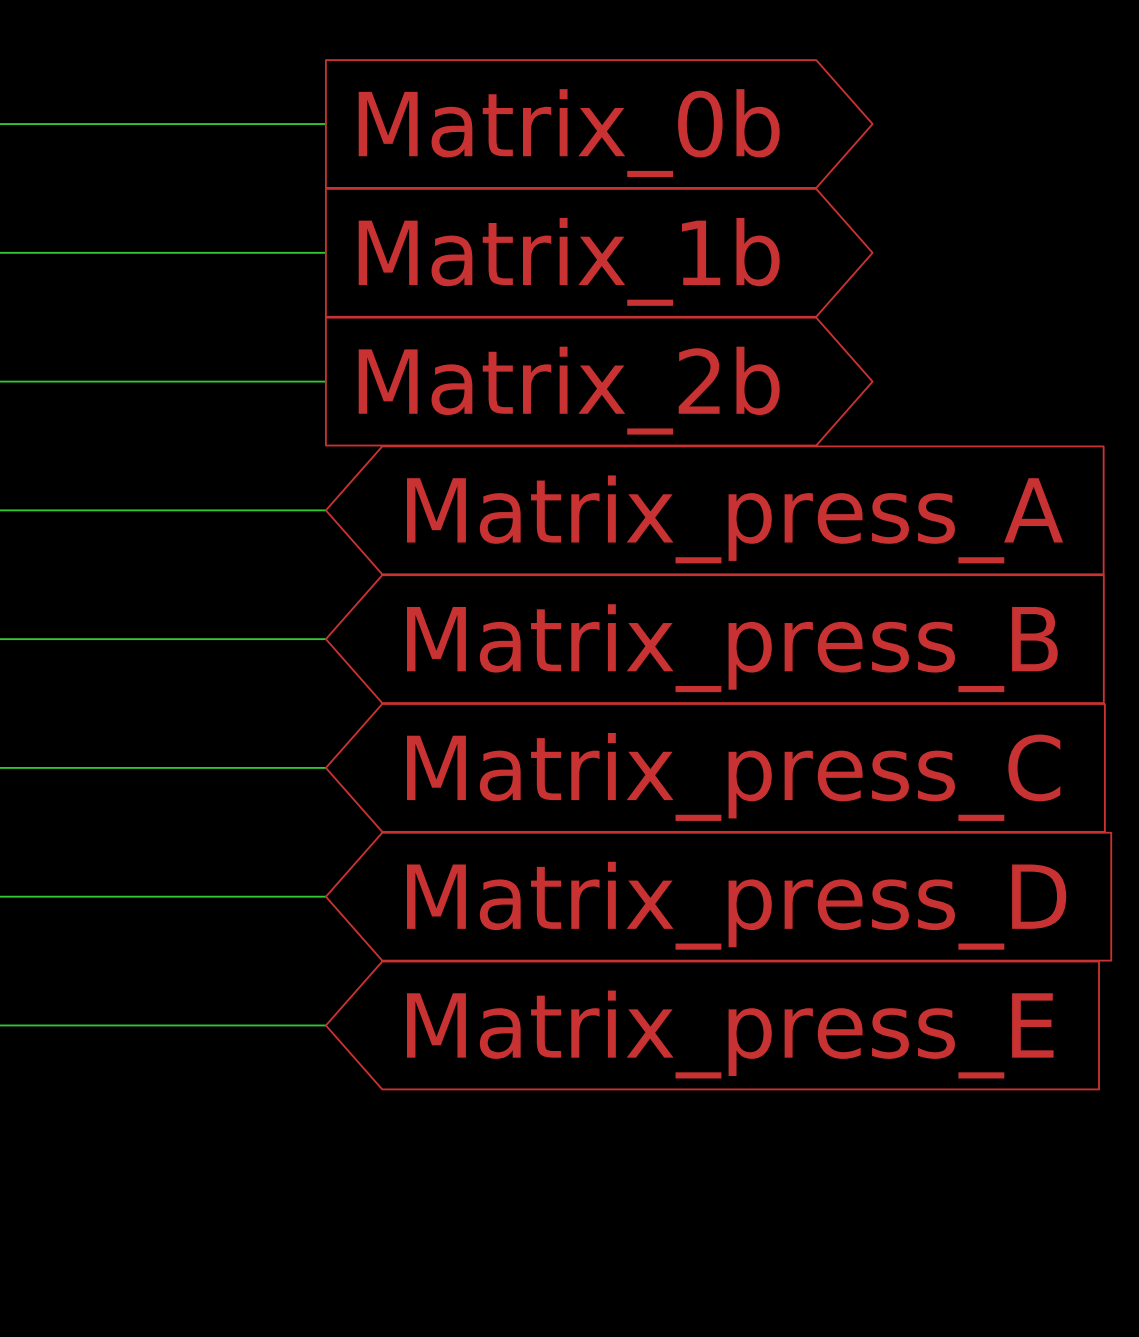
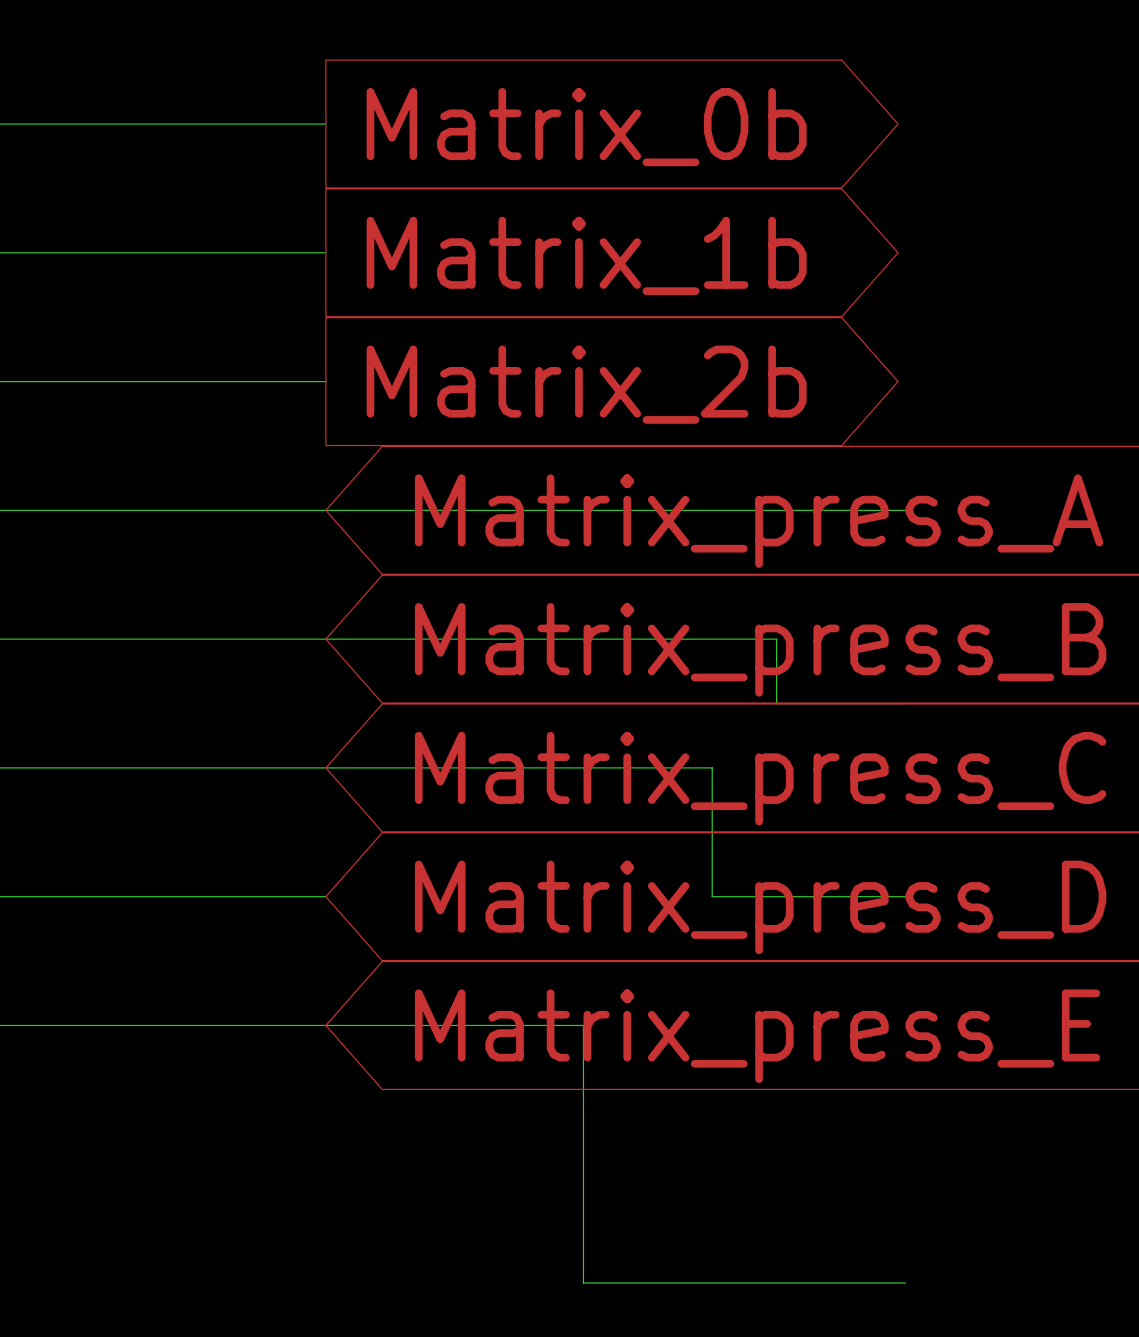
wire: none -> (325, 510) (905, 510)
wire: none -> (325, 639) (776, 639) (776, 703) (905, 703)
wire: none -> (325, 767) (712, 767) (712, 896) (905, 896)
wire: none -> (325, 1025) (583, 1025) (583, 1283) (905, 1283)

